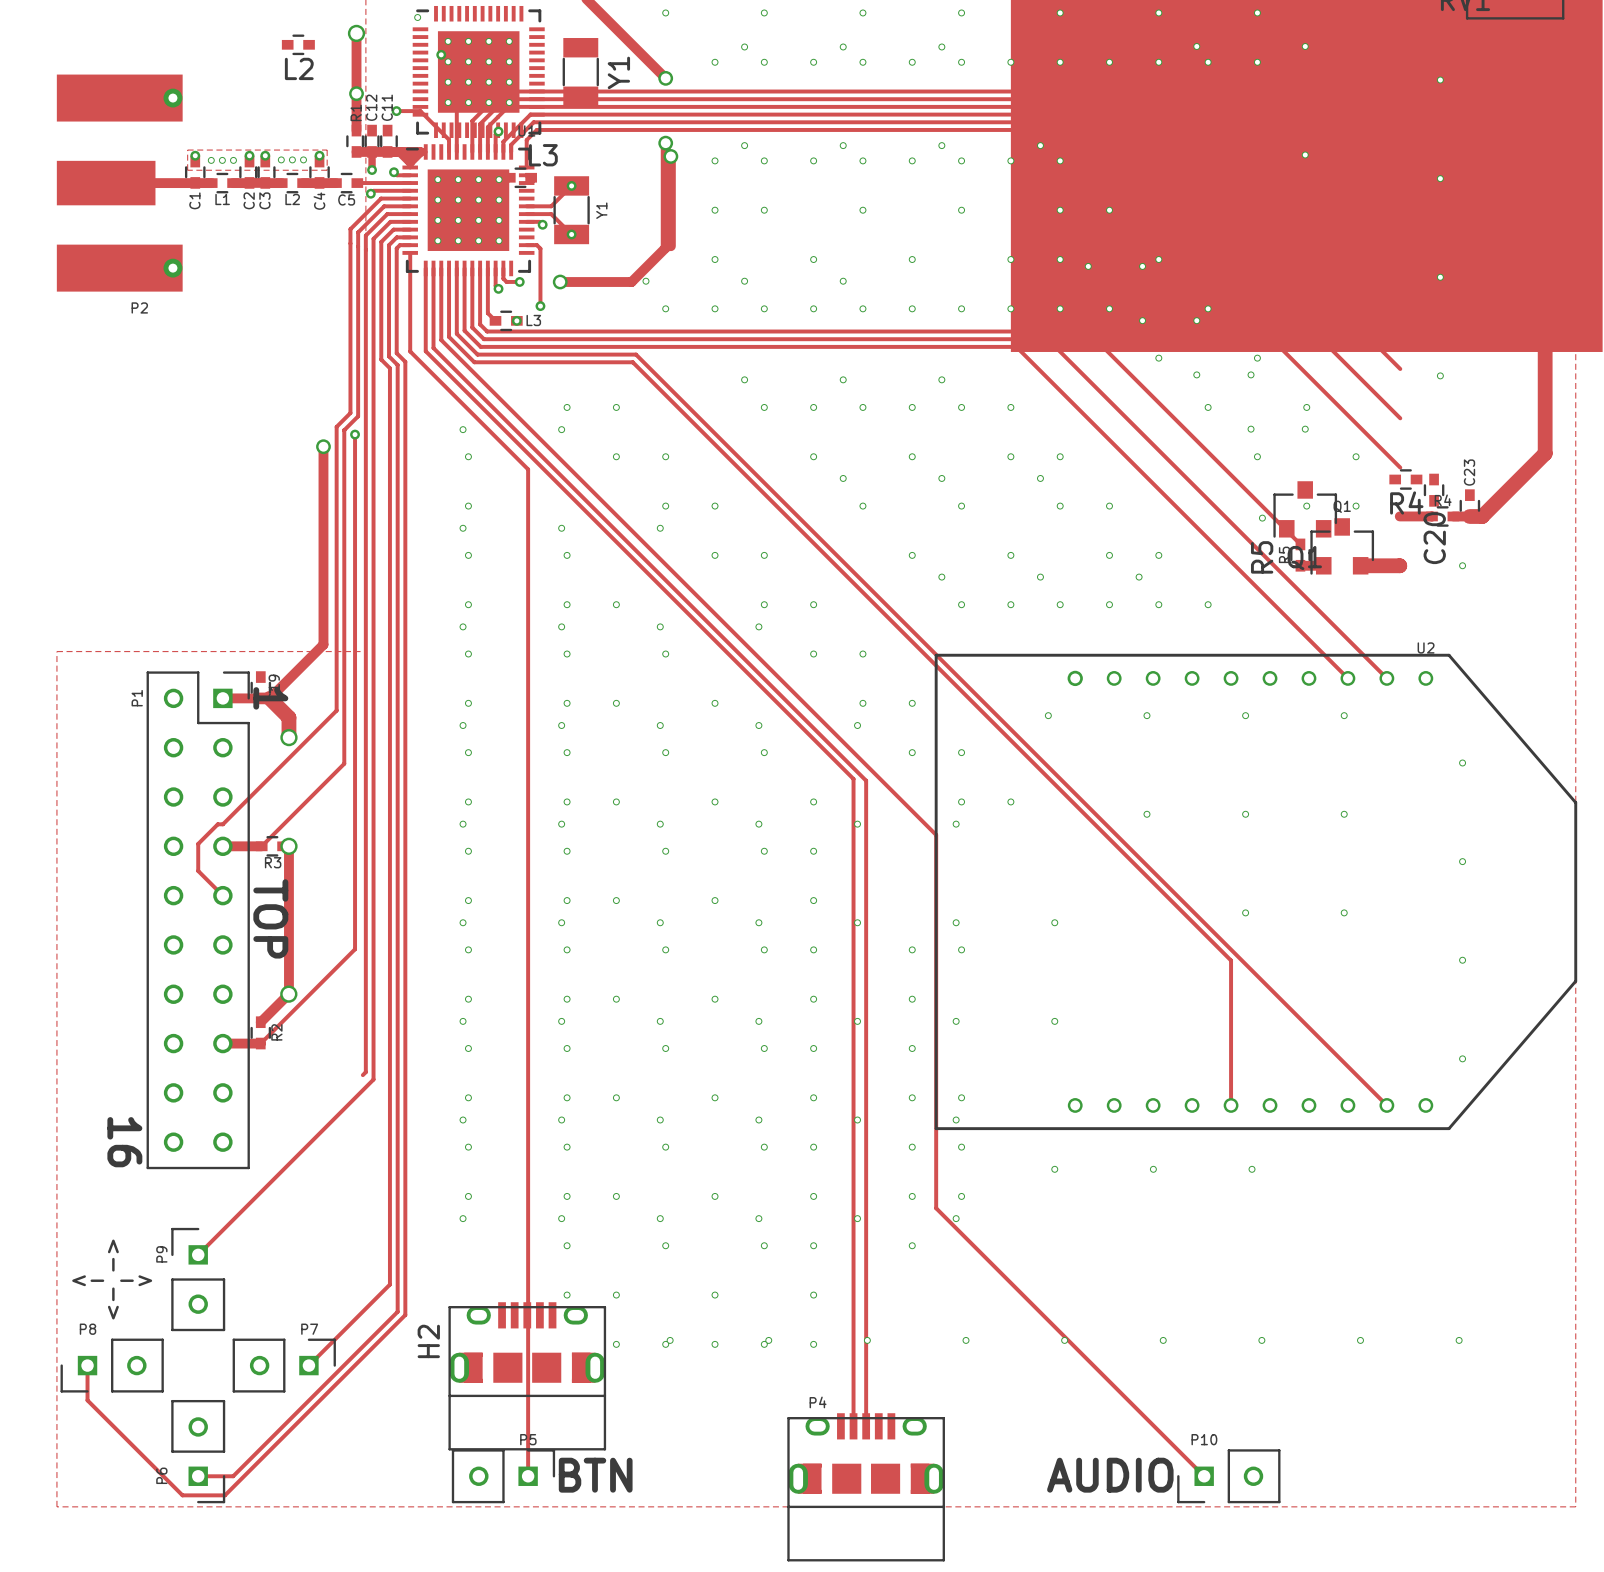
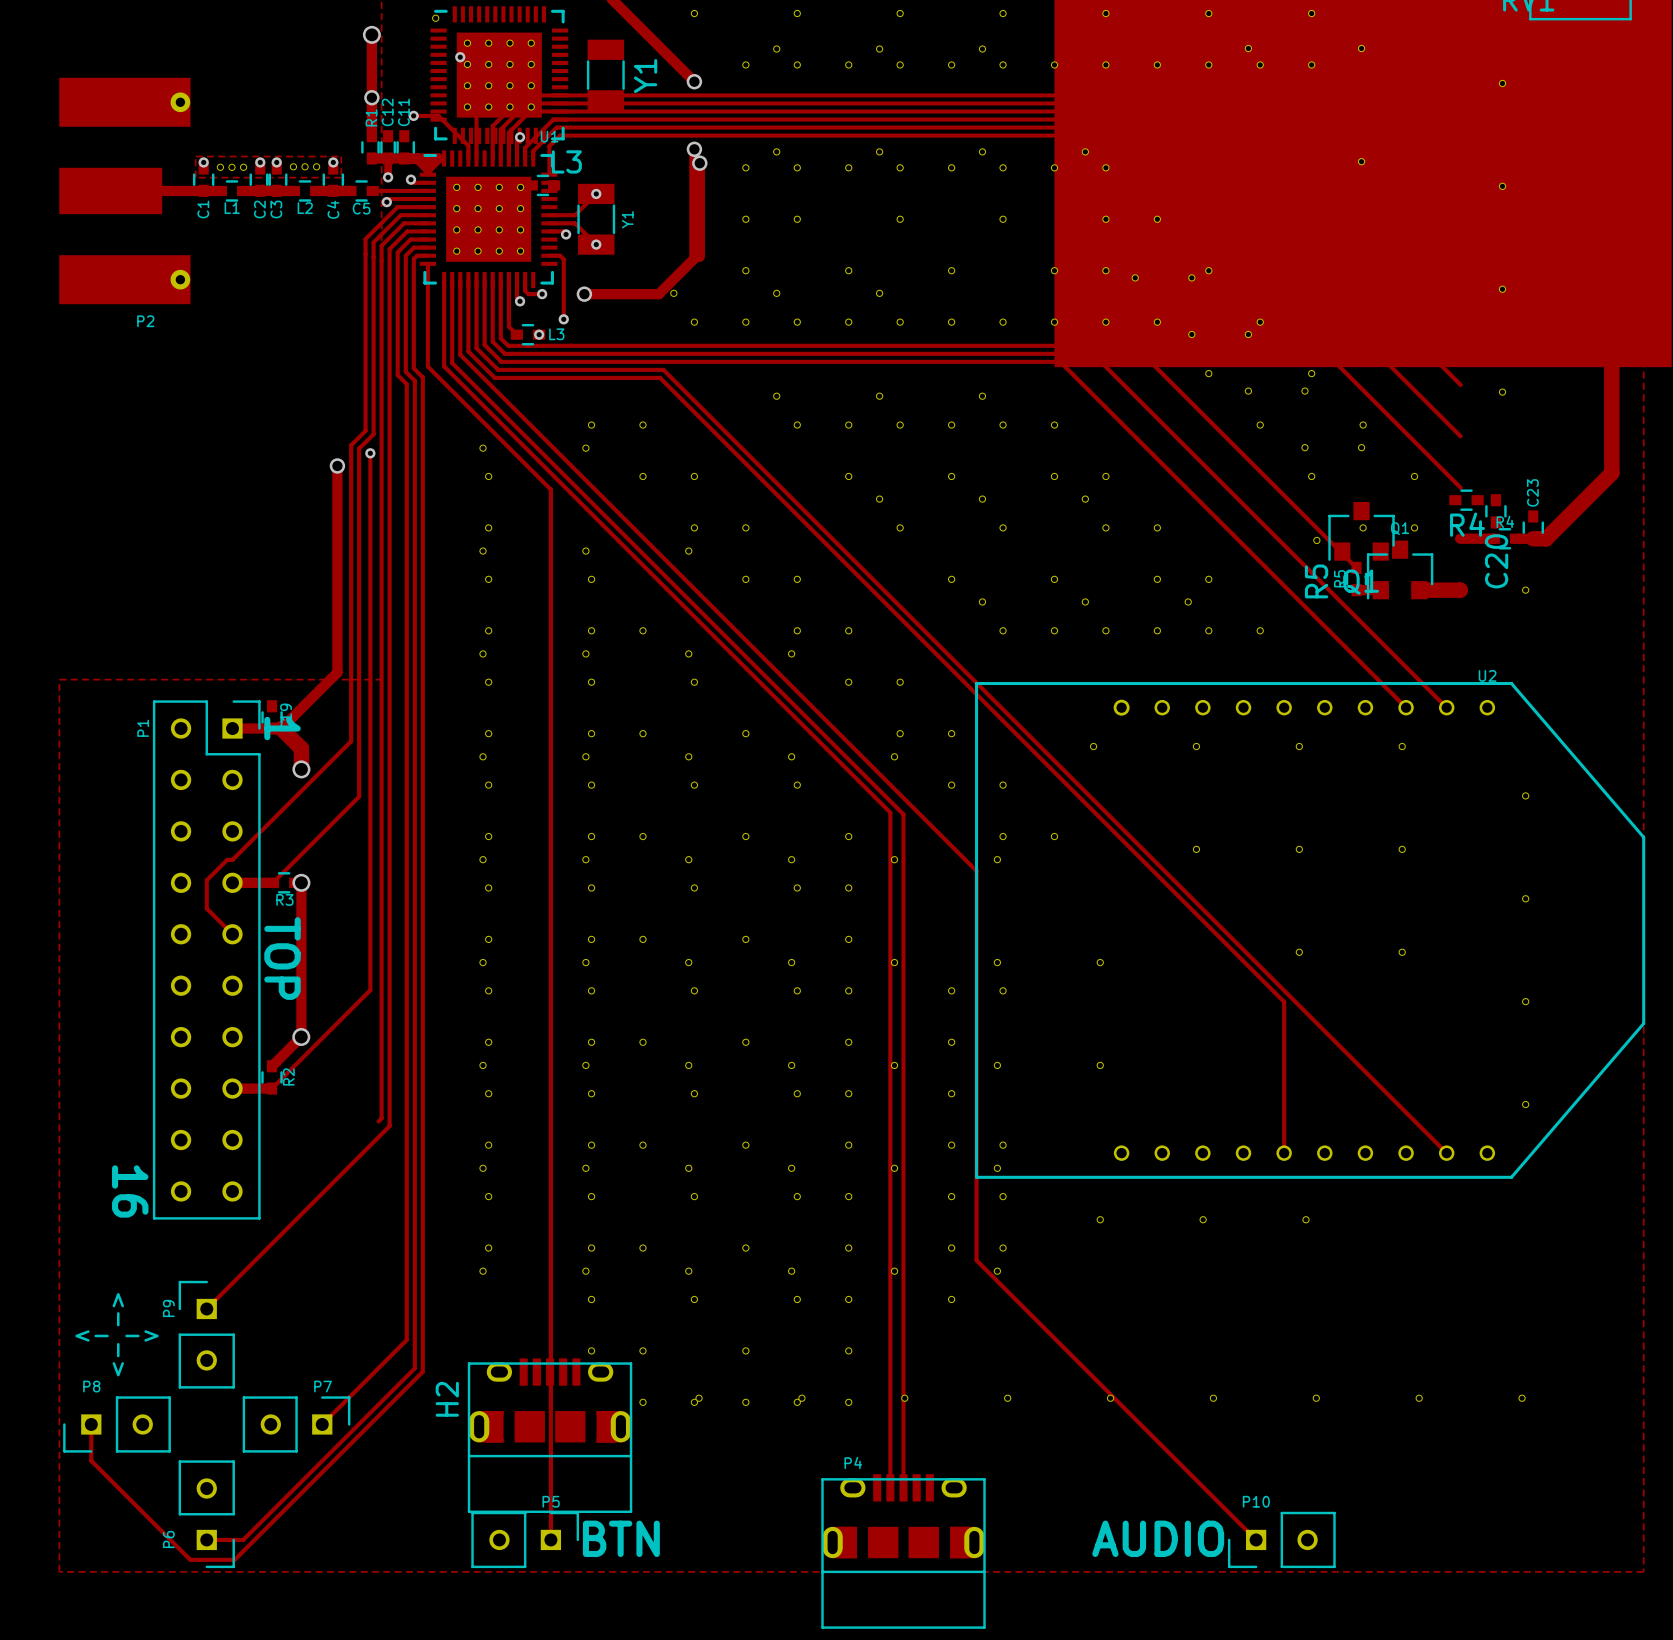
L2: (298, 44) -> none

